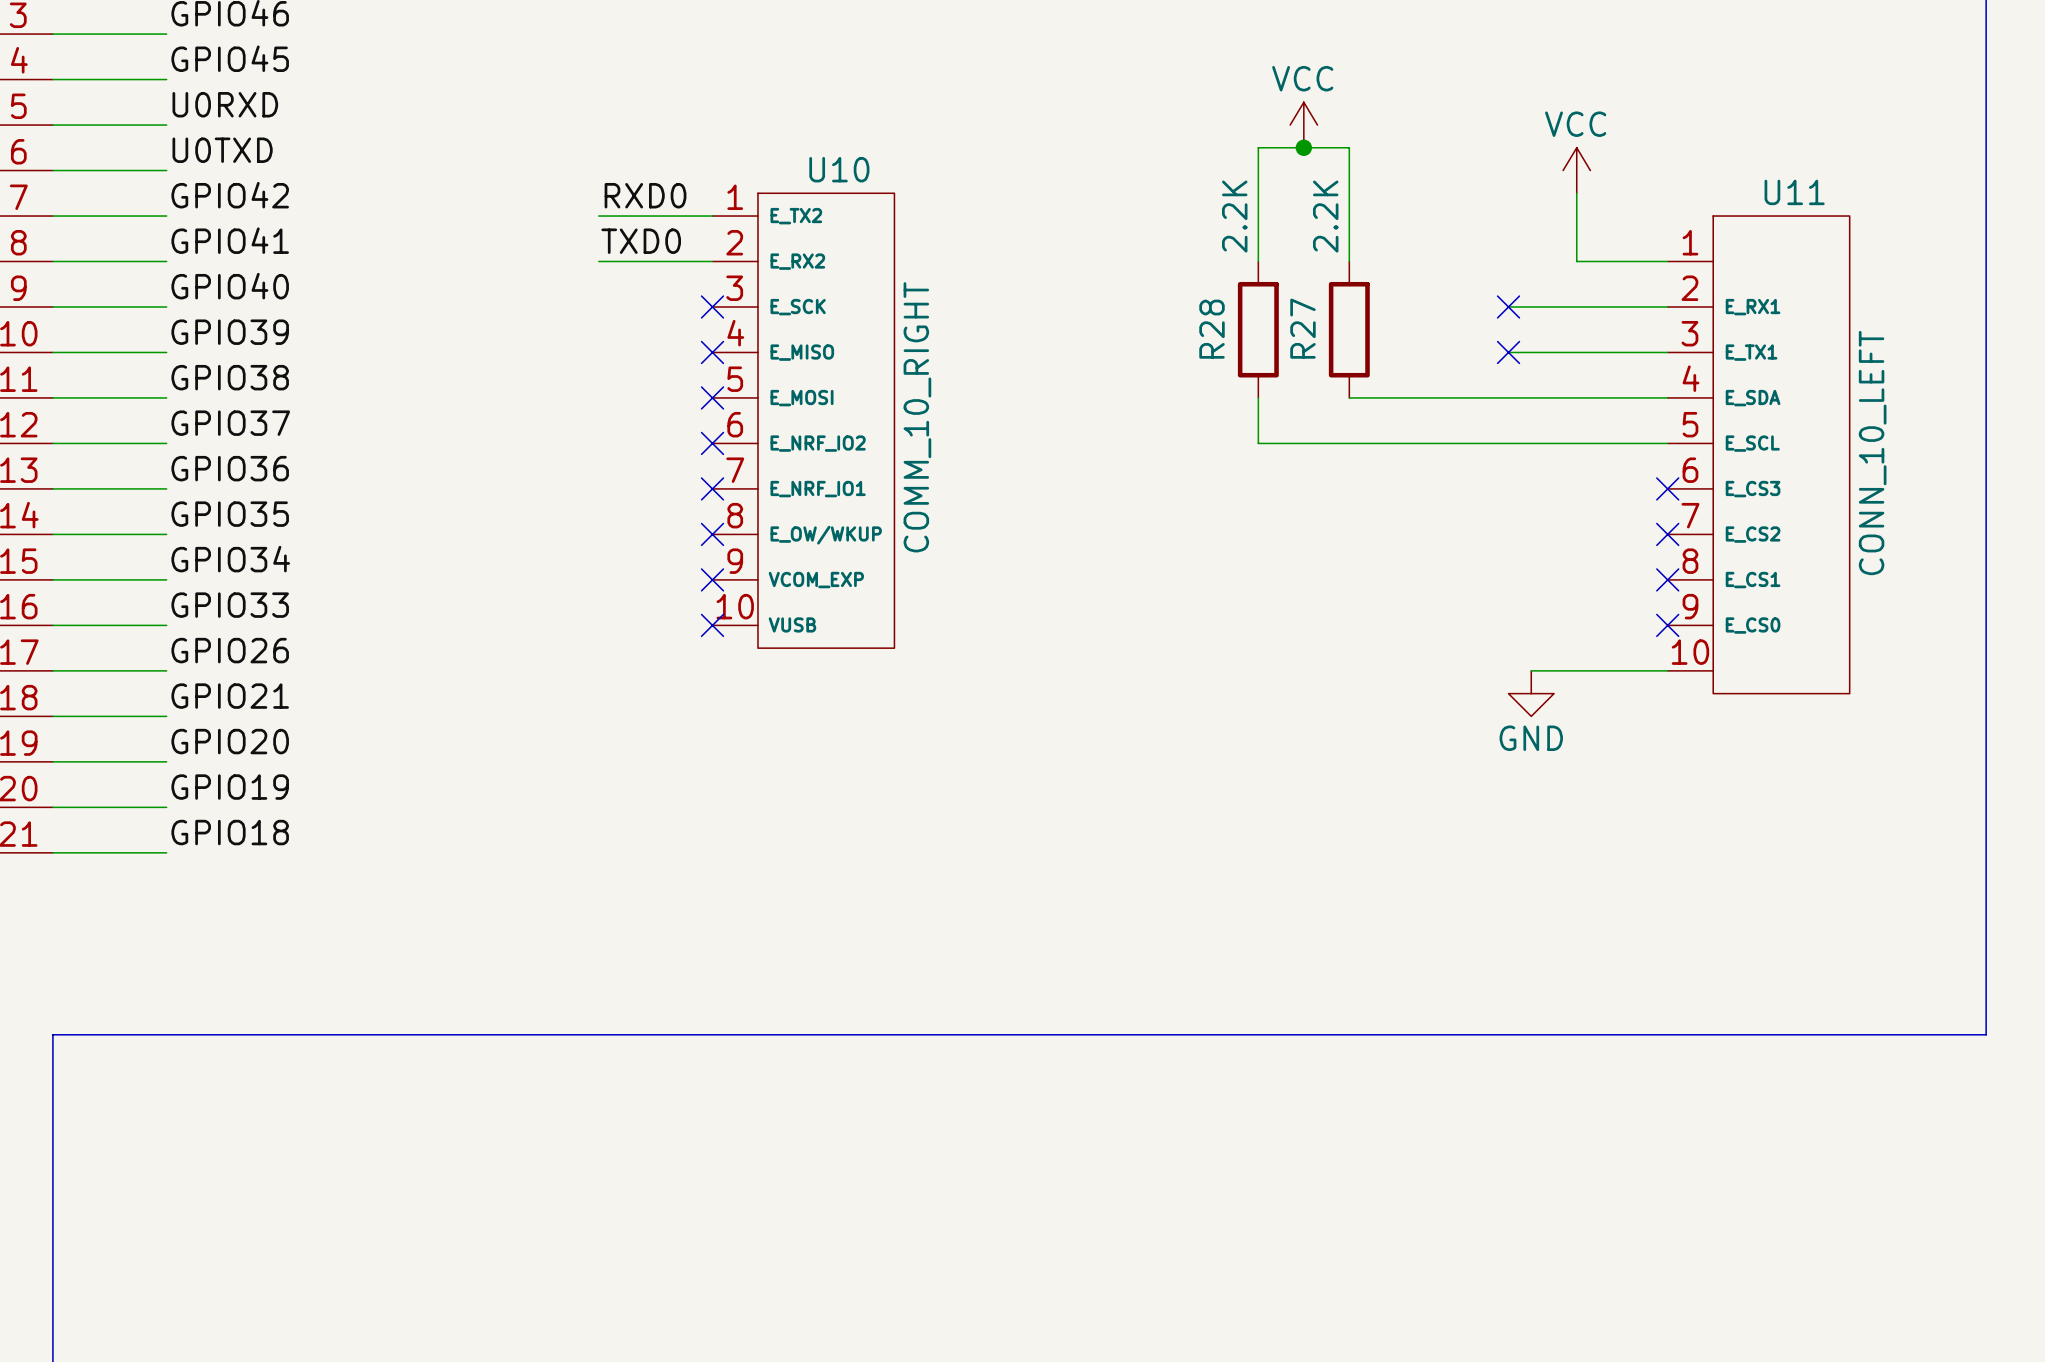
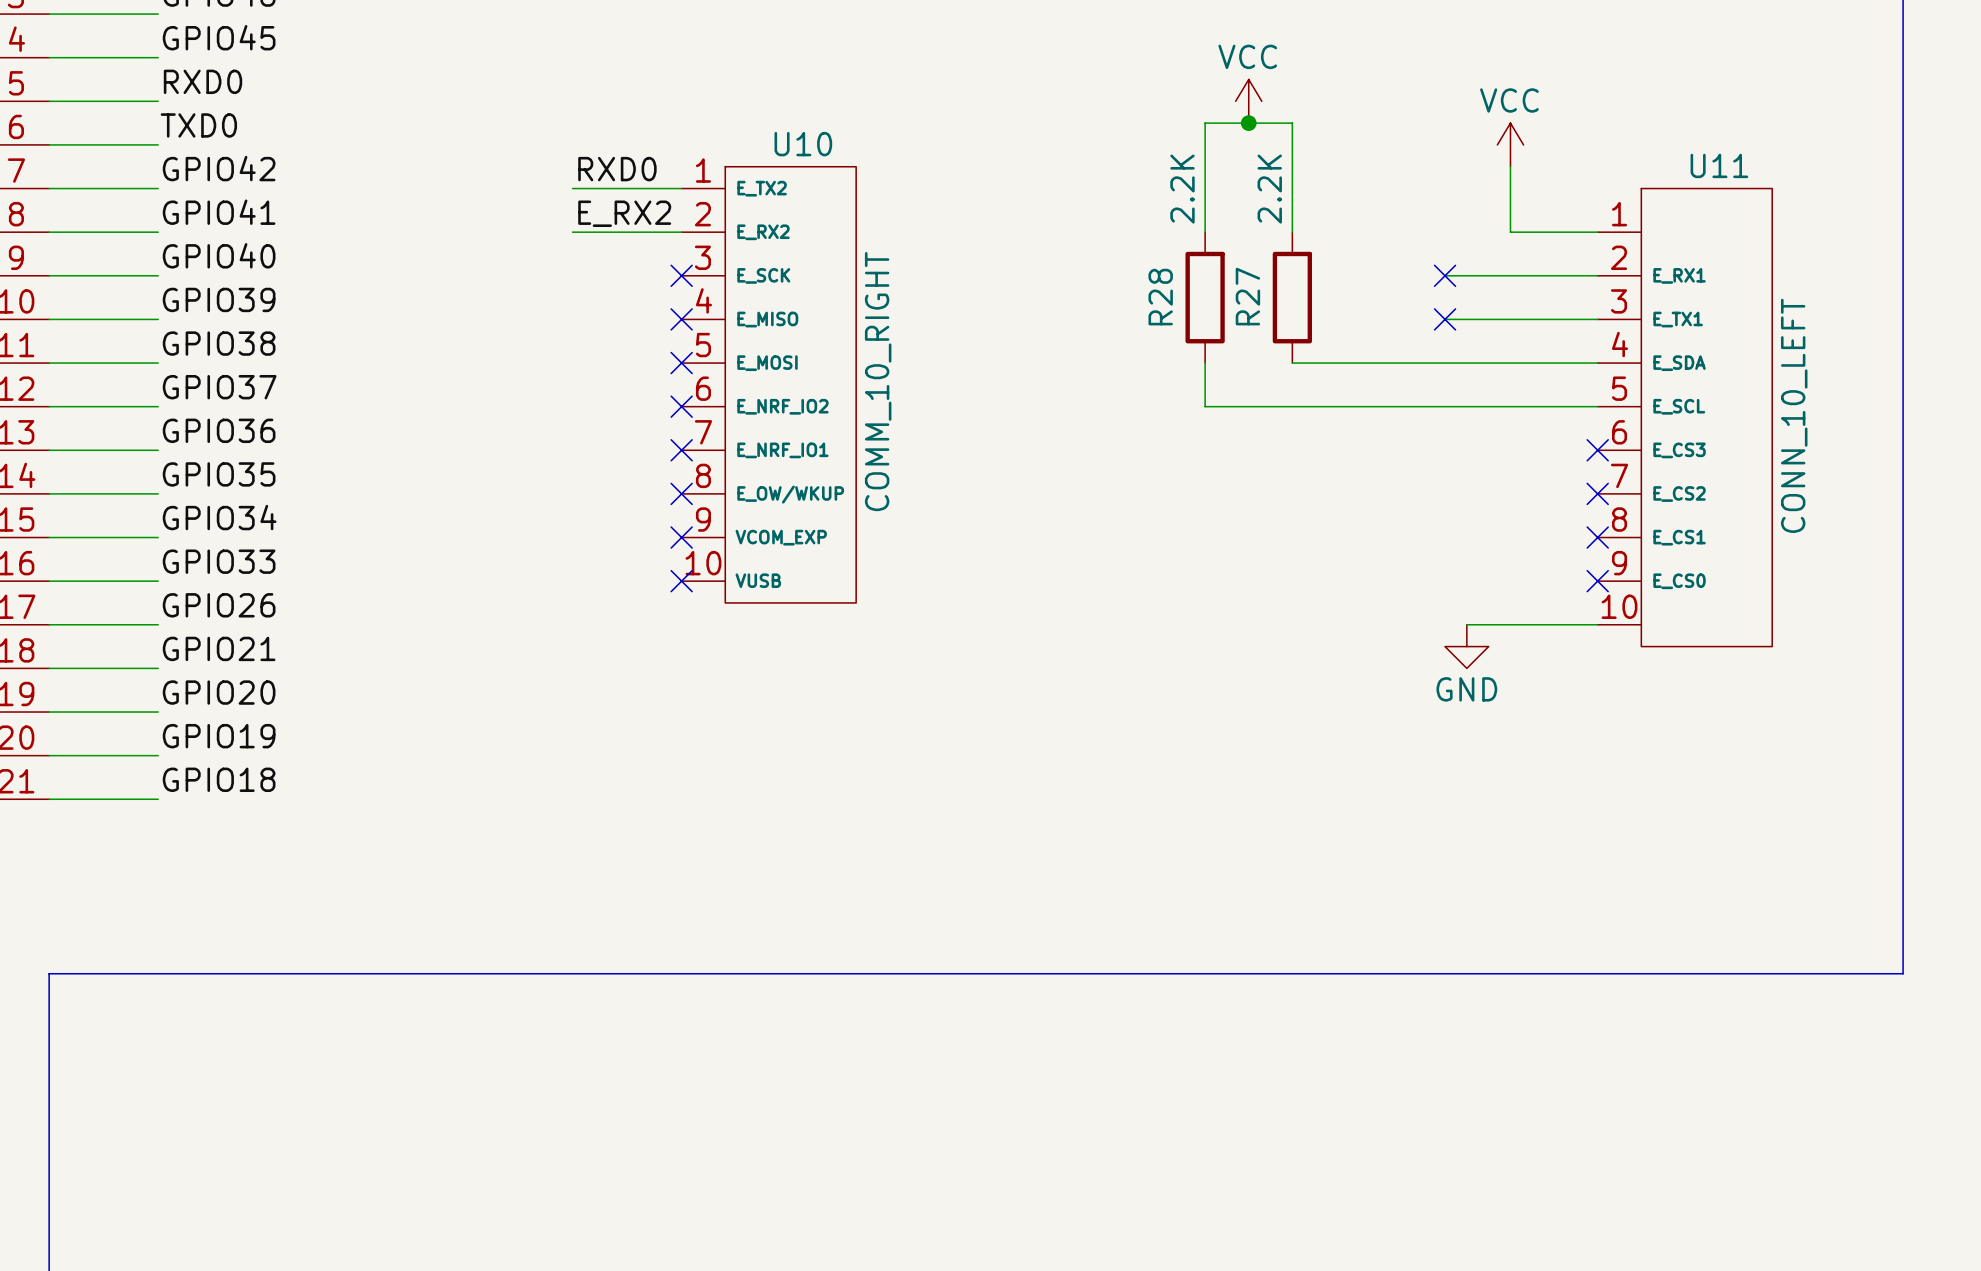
label: U0RXD (225, 104) -> RXD0 (203, 81)
label: U0TXD (222, 150) -> TXD0 (198, 125)
label: TXD0 (641, 241) -> E_RX2 (624, 213)

